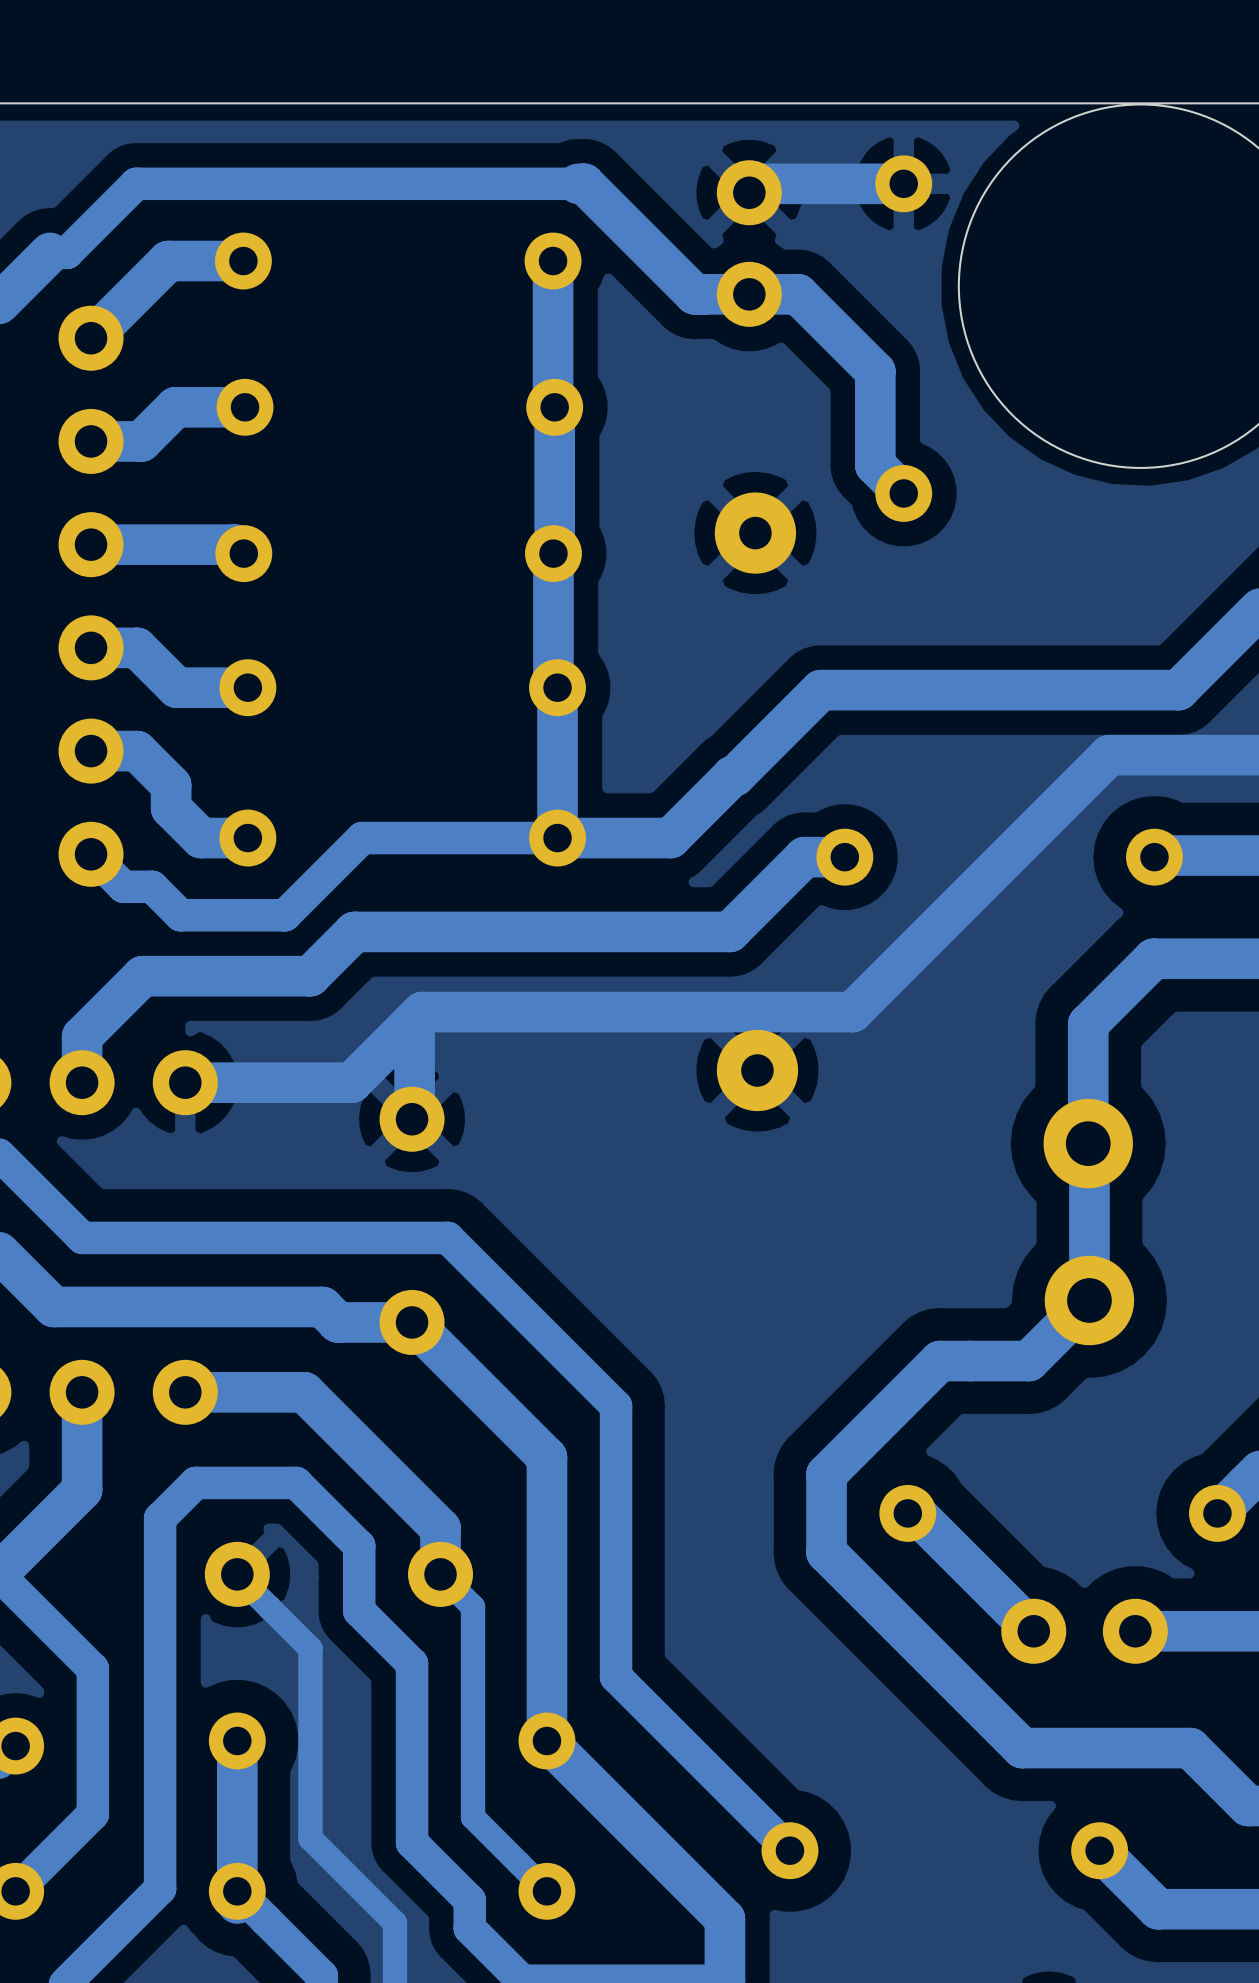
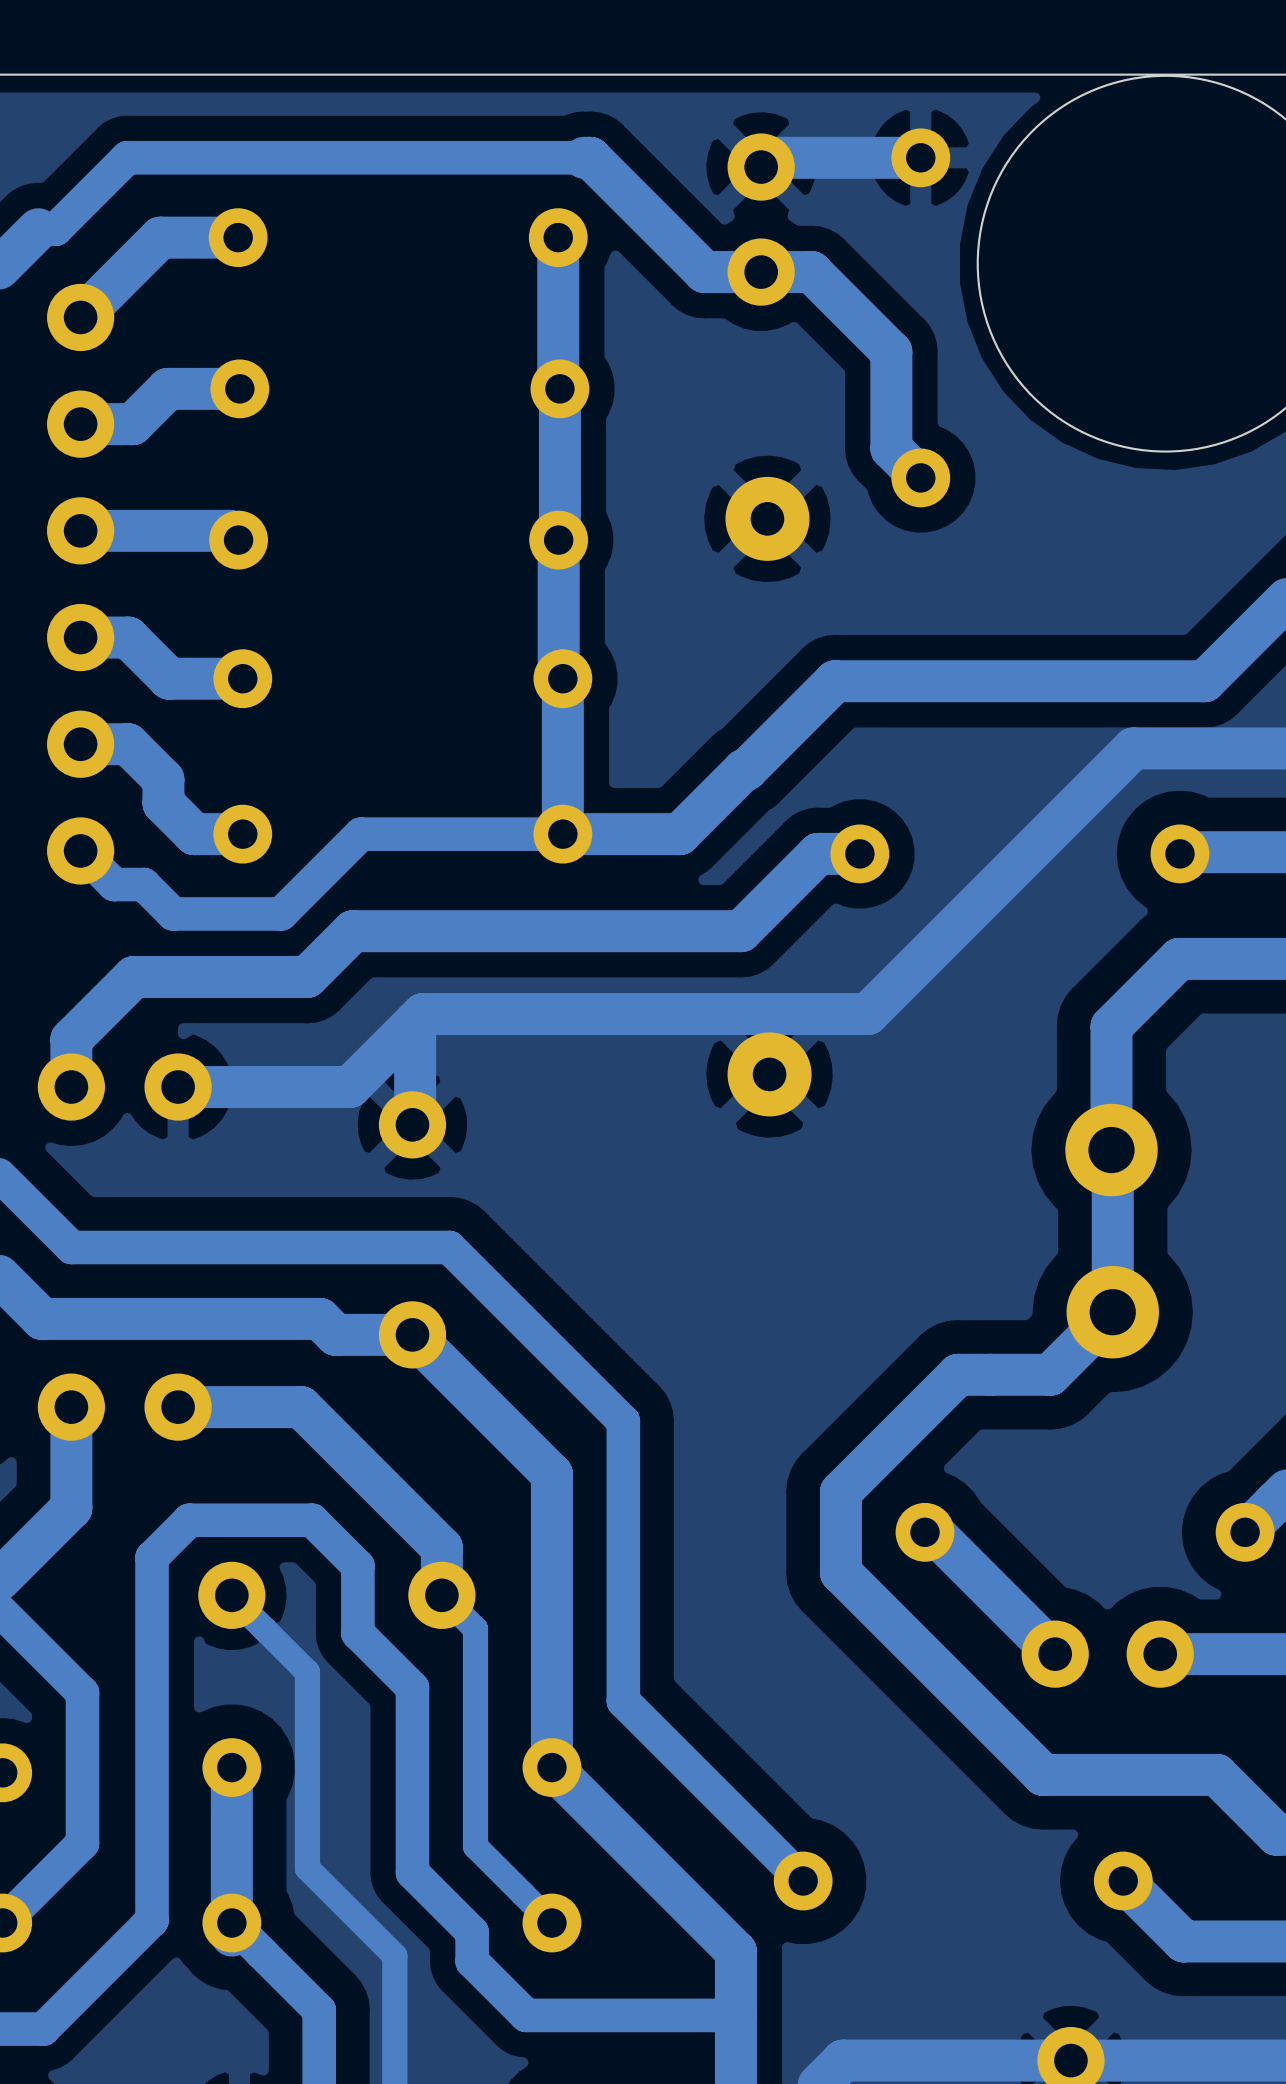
track: (315, 1501) (296, 1482) (195, 1482) (160, 1518) (160, 1537) -> (312, 1520) (189, 1520) (152, 1557)

